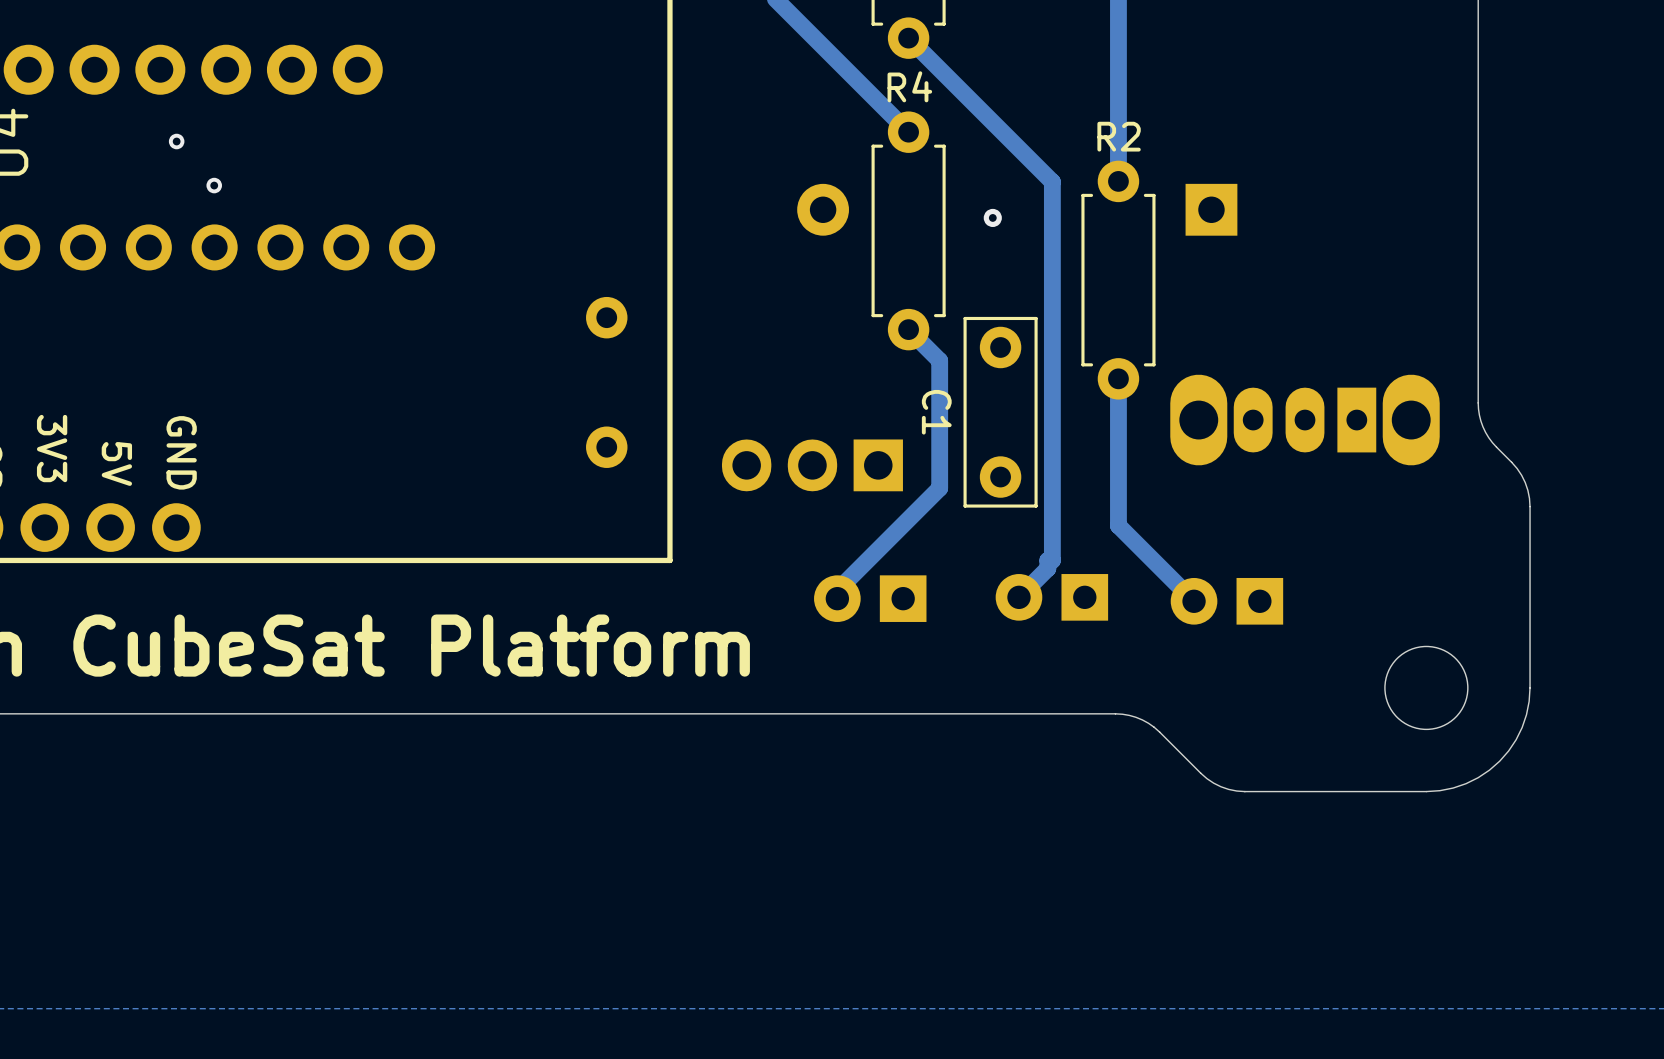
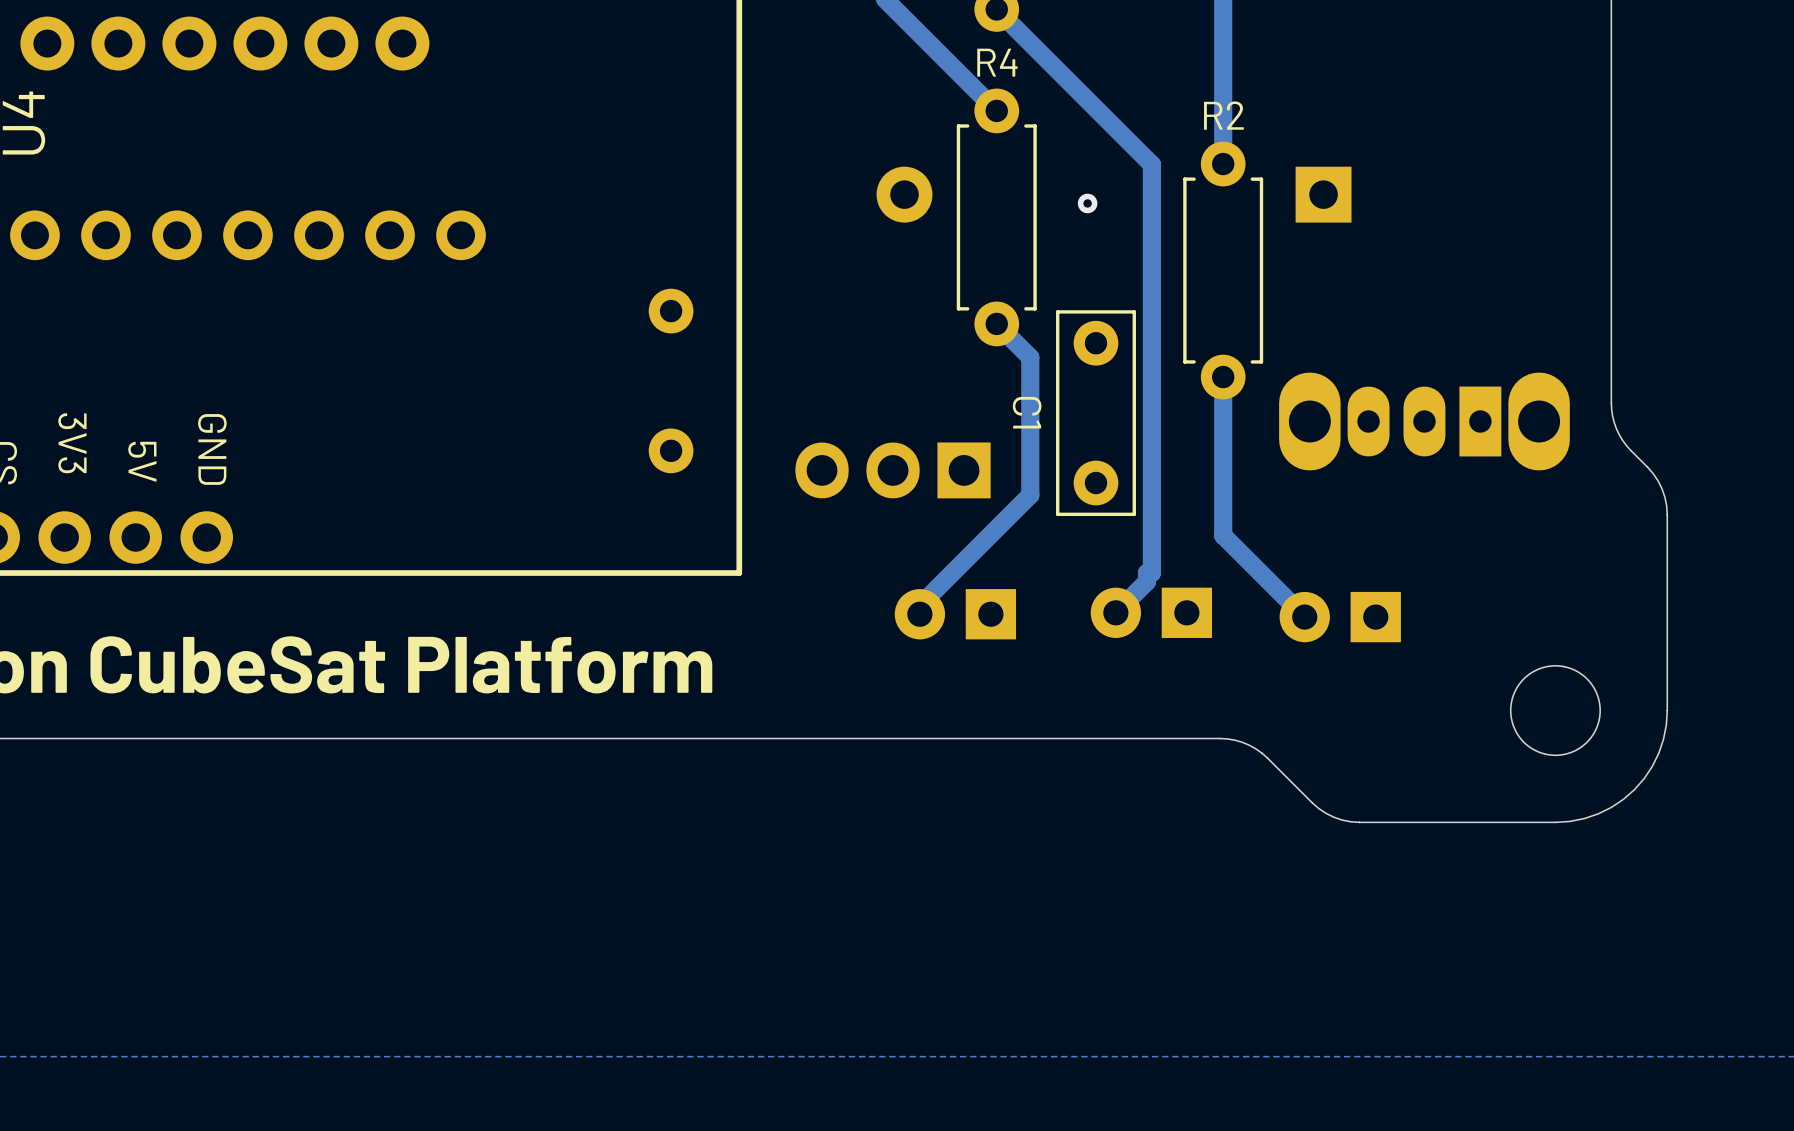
via: (176, 141) -> none
via: (214, 185) -> none

